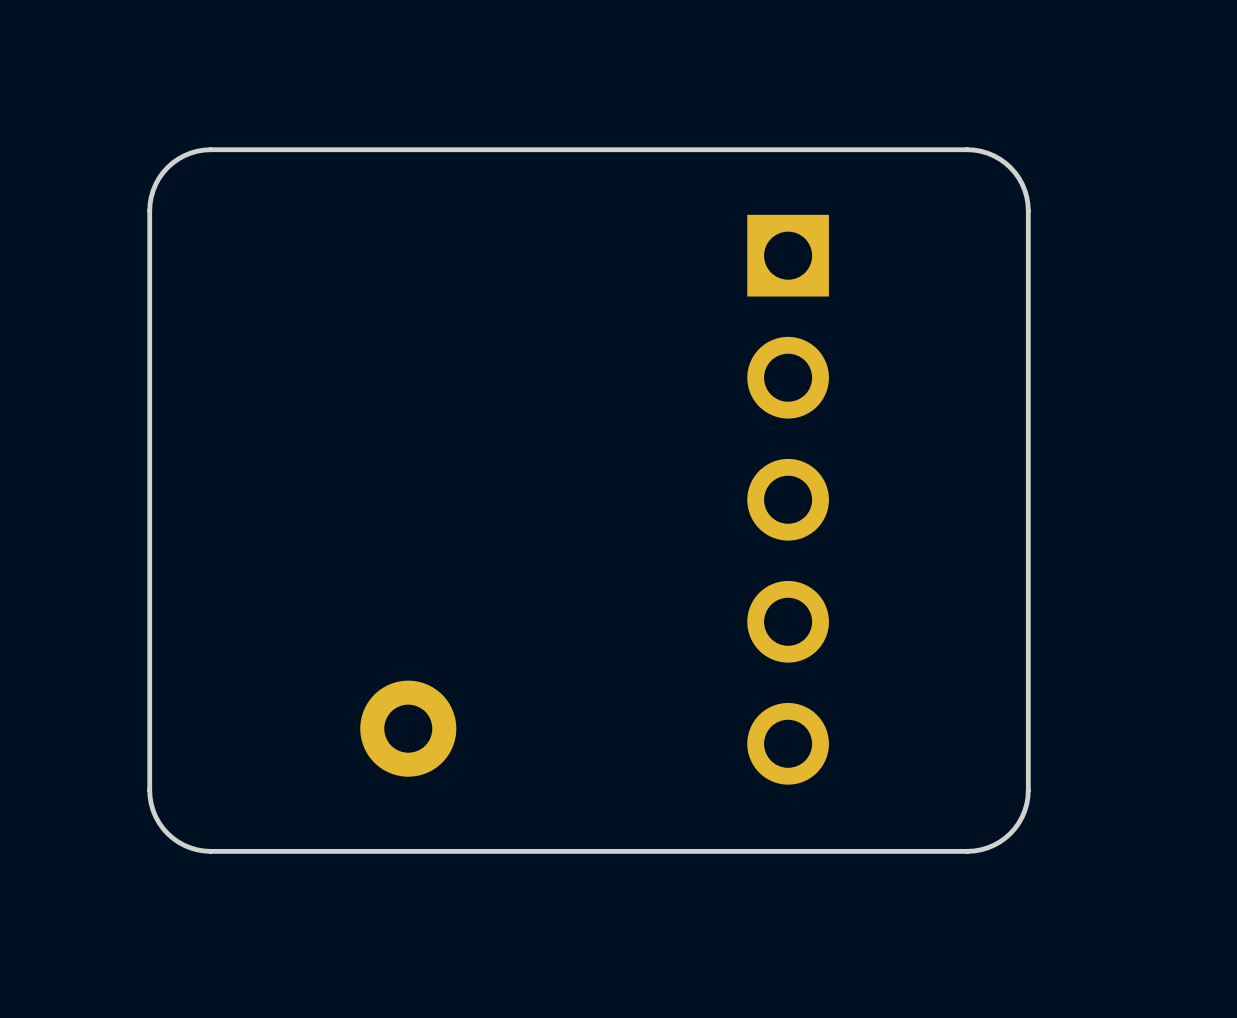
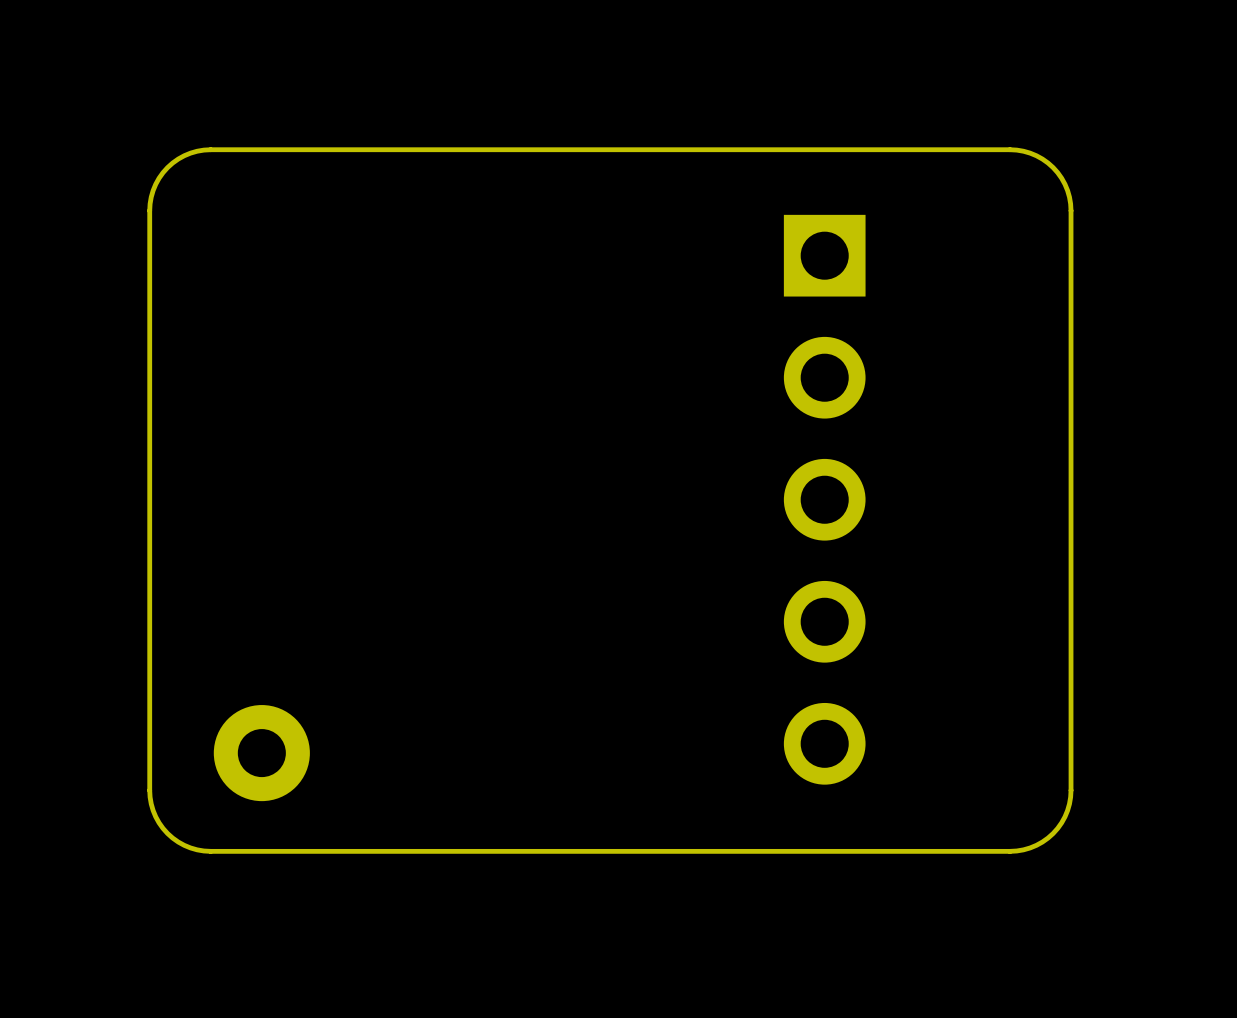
board edge: (967, 149) (980, 151) (993, 155) (1010, 167) (1022, 184) (1026, 197) (1028, 210) (1027, 797) (1022, 816) (1010, 833) (999, 842) (987, 847) (967, 851) -> (967, 149) (1016, 150) (1030, 153) (1042, 159) (1053, 167) (1061, 178) (1067, 190) (1071, 210) (1070, 797) (1067, 810) (1061, 822) (1048, 838) (1036, 845) (1016, 850) (967, 851)
part position: (788, 499) -> (824, 499)
part position: (408, 728) -> (261, 753)

